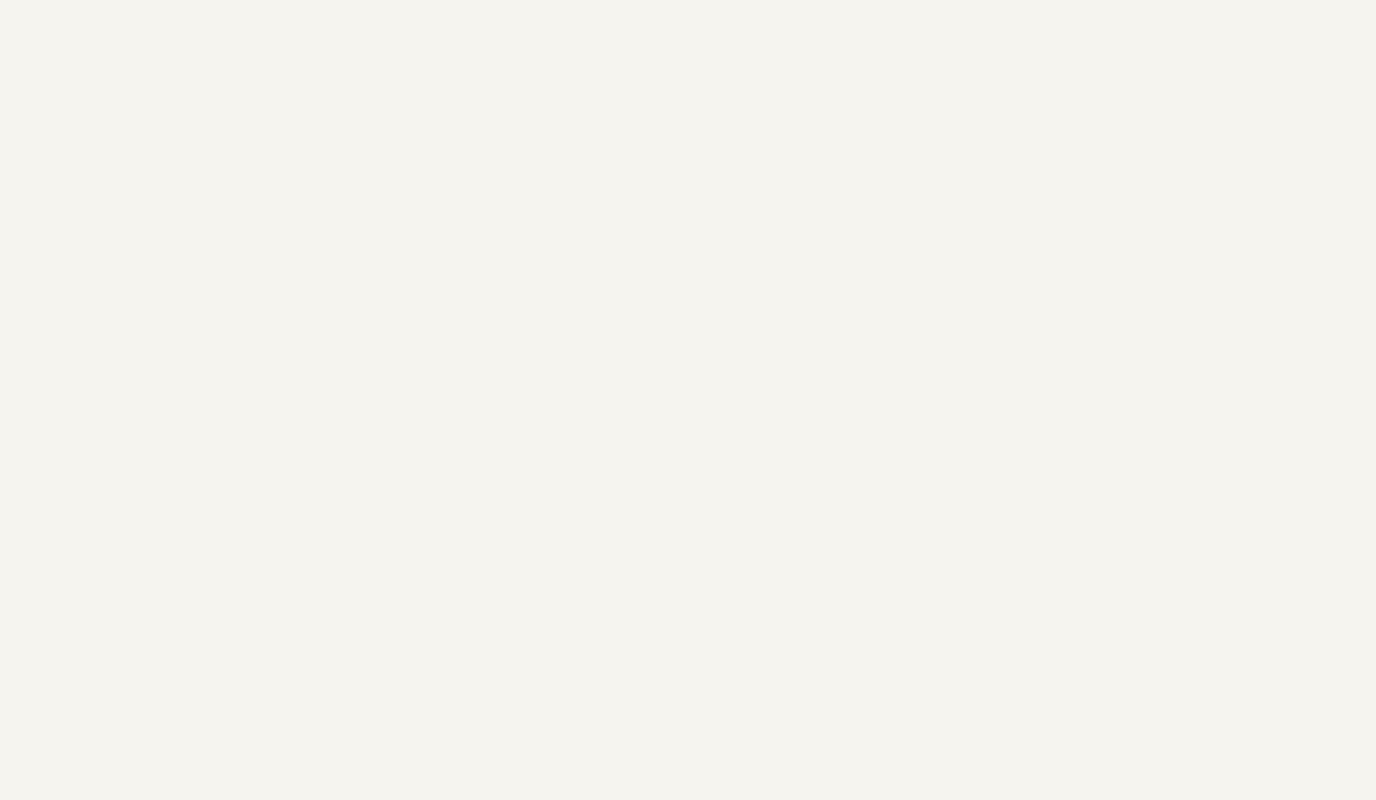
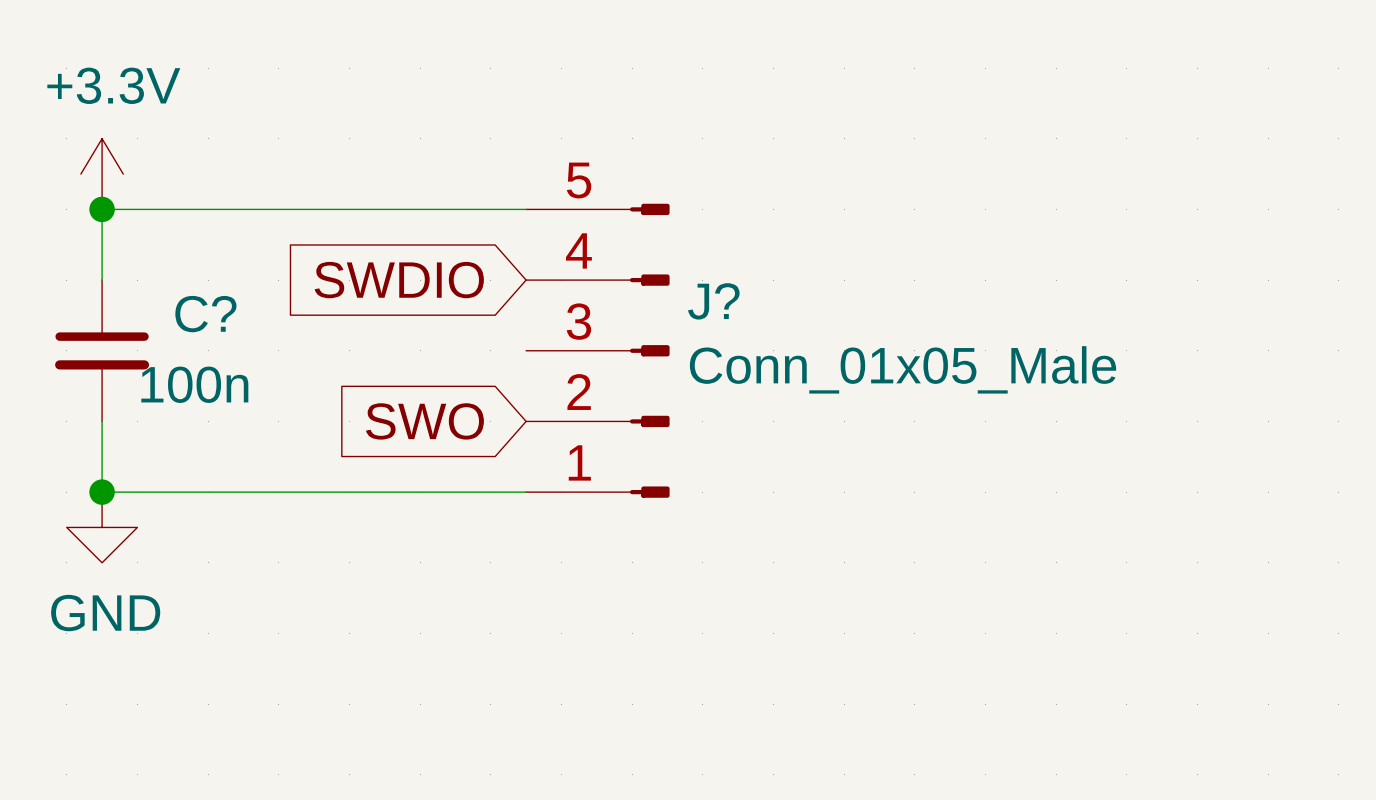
power symbol: none -> +3.3V (102, 174)
junction: none -> (102, 209)
wire: none -> (526, 209) (102, 209) (102, 280)
global label: none -> SWDIO (399, 280)
C?: none -> 100n (102, 350)
J?: none -> Conn_01x05_Male (597, 350)
wire: none -> (102, 421) (102, 492) (526, 492)
global label: none -> SWO (424, 421)
junction: none -> (102, 492)
power symbol: none -> GND (102, 527)

